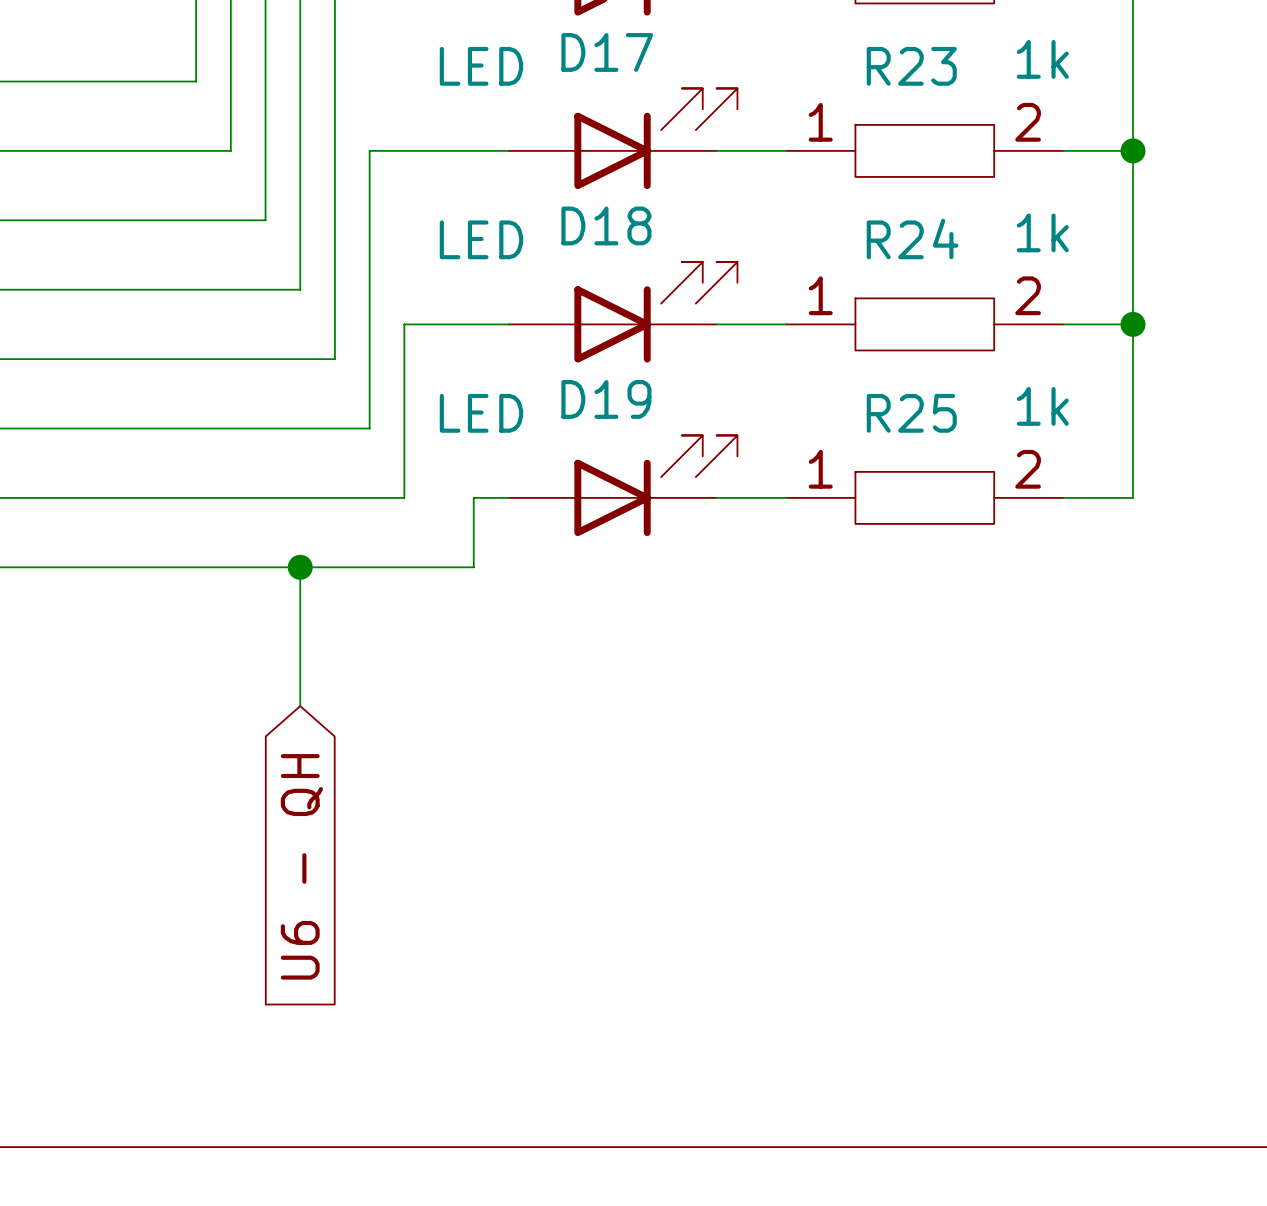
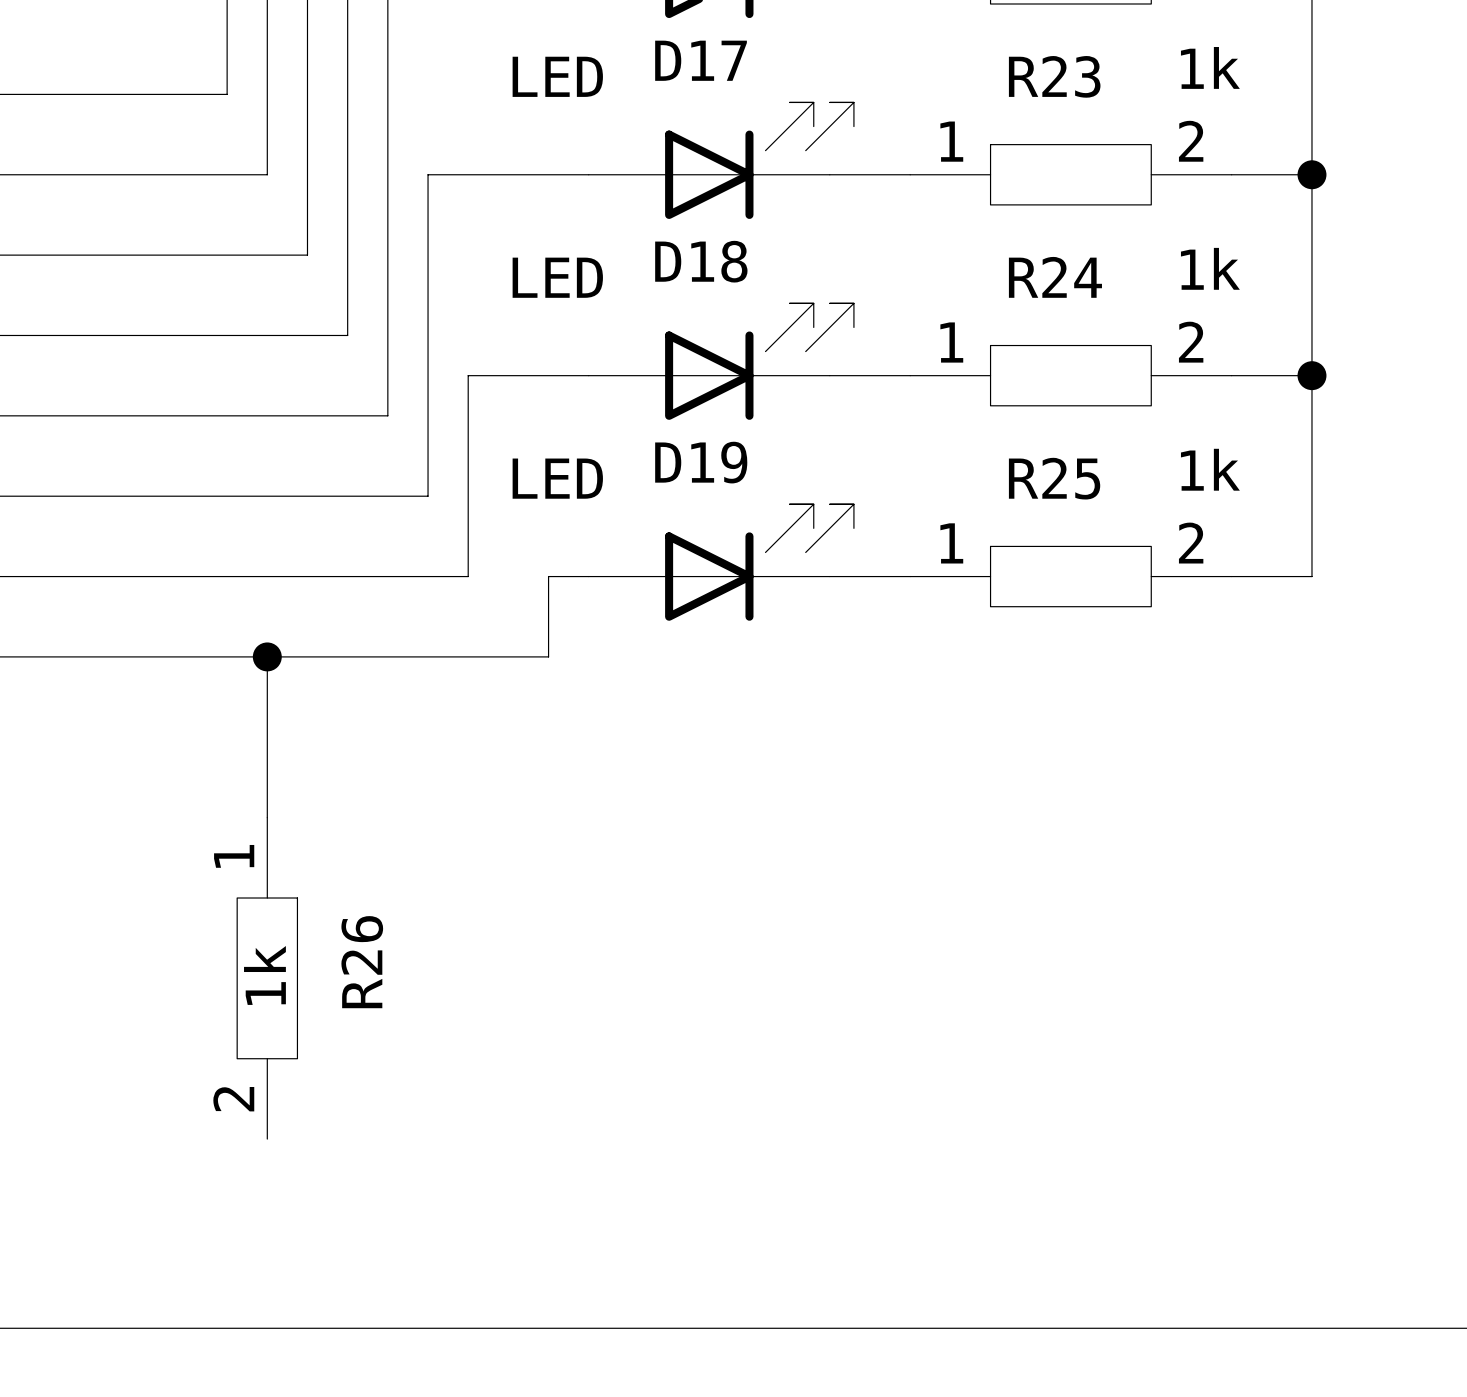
wire: (300, 567) (300, 706) -> (267, 656) (267, 817)
junction position: (300, 567) -> (267, 656)
R26: none -> 1k (267, 978)
global label: U6 - QH (301, 866) -> none

